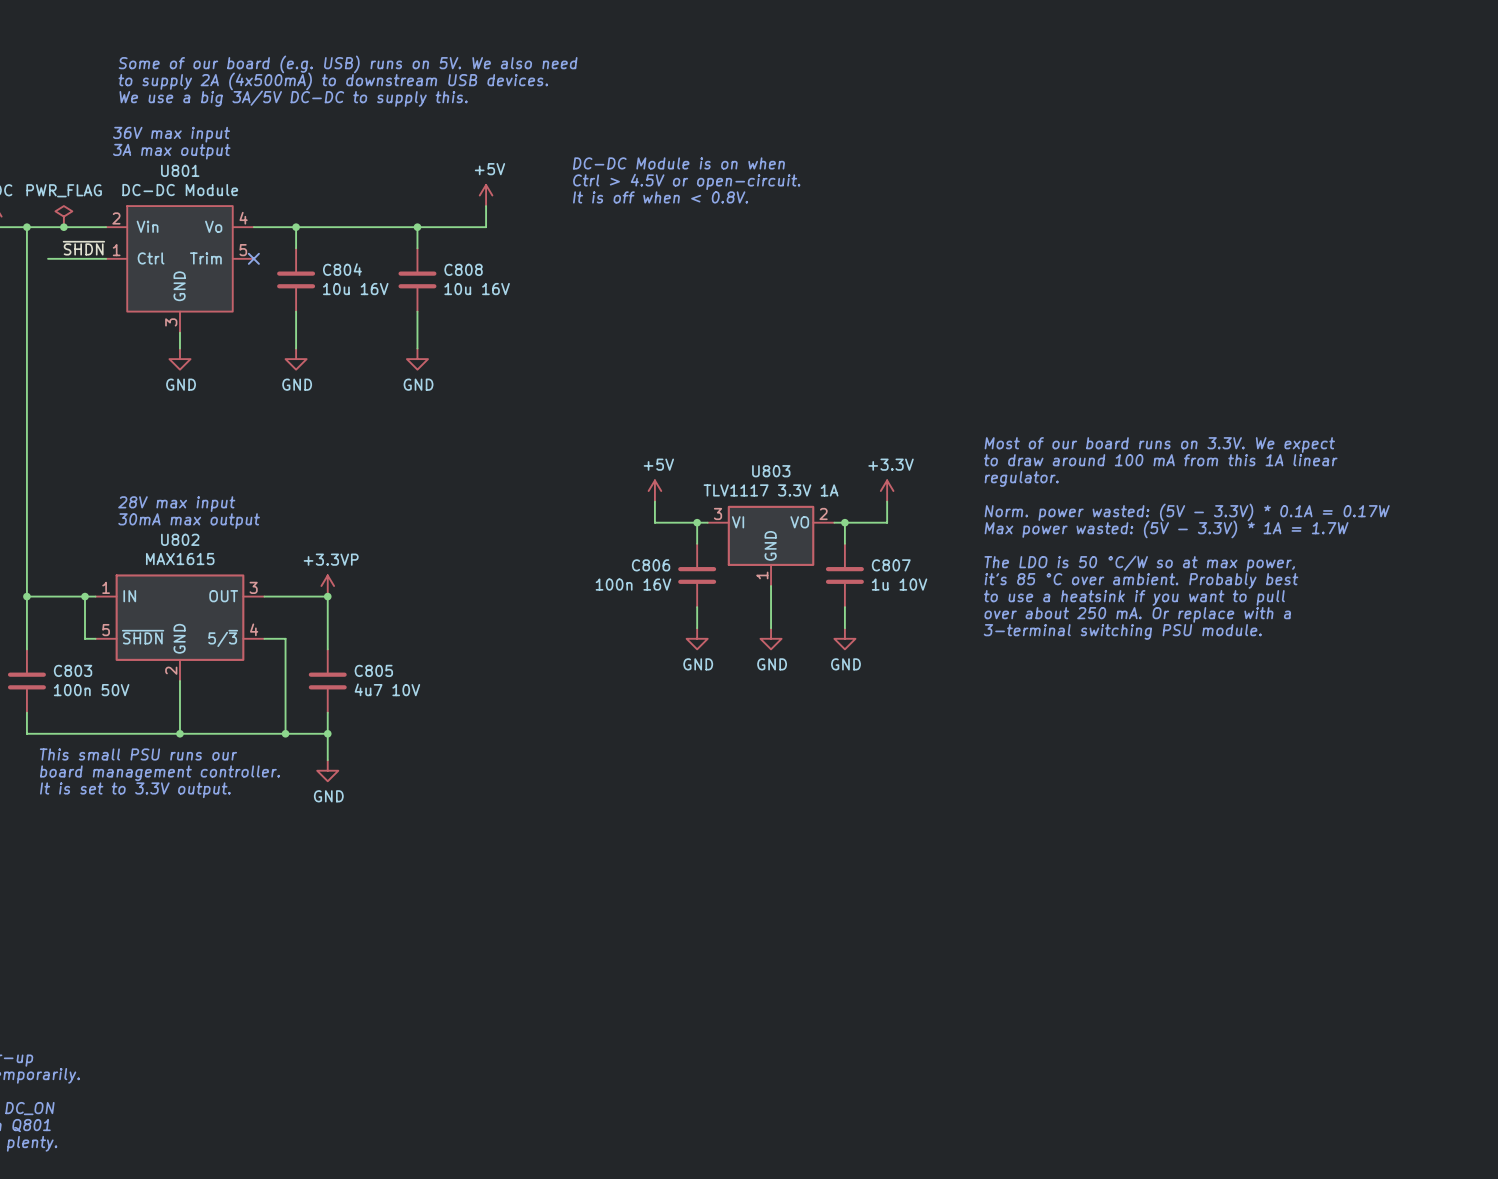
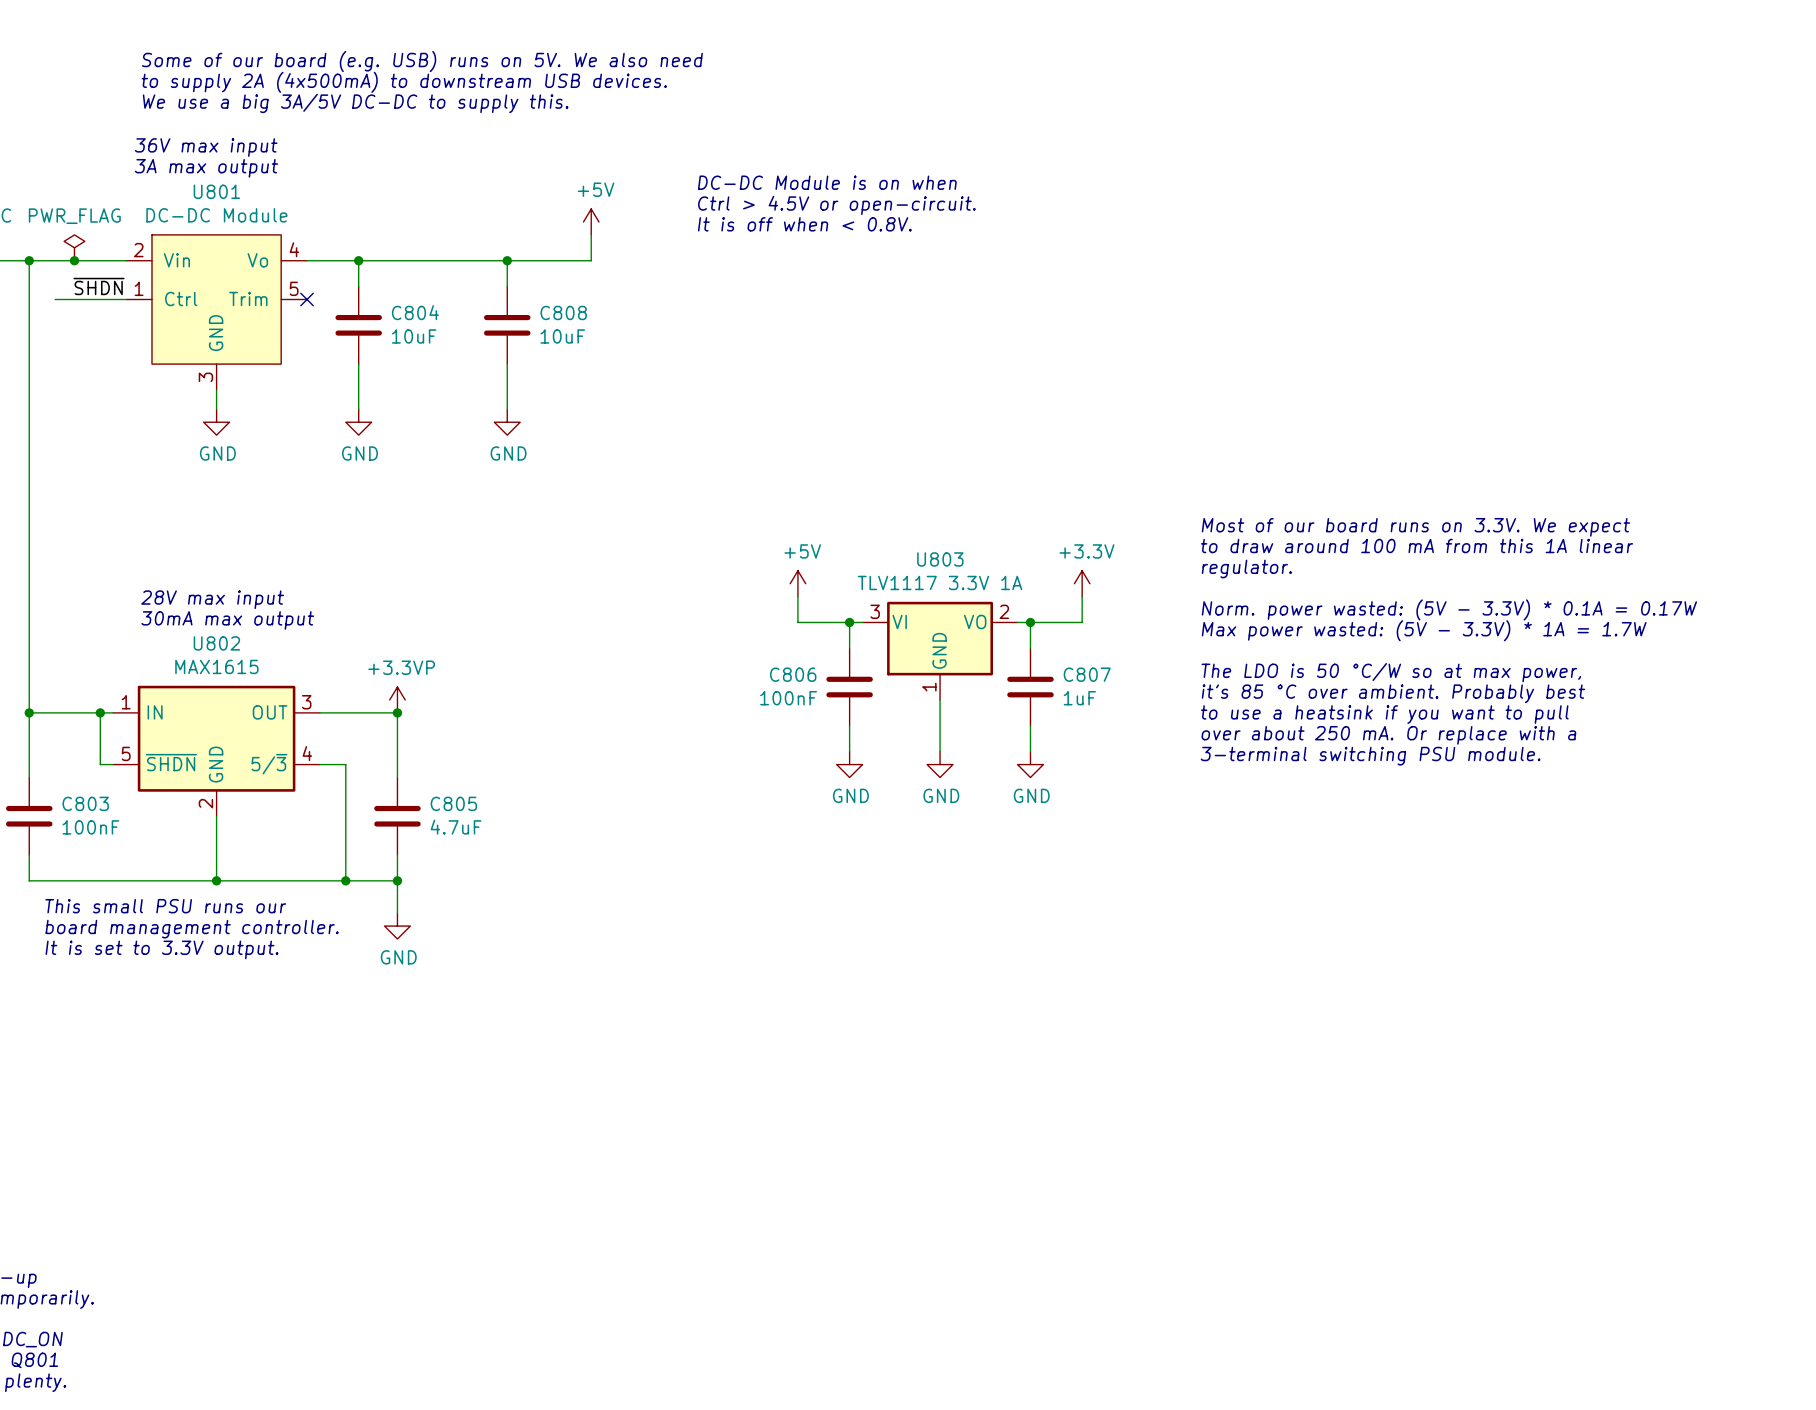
C804 value: 10u 16V (355, 289) -> 10uF (414, 336)
C808 value: 10u 16V (477, 289) -> 10uF (562, 336)
C806 value: 100n 16V (633, 584) -> 100nF (788, 698)
C807 value: 1u 10V (899, 584) -> 1uF (1079, 698)
C805 value: 4u7 10V (387, 689) -> 4.7uF (456, 827)
C803 value: 100n 50V (91, 690) -> 100nF (90, 827)

